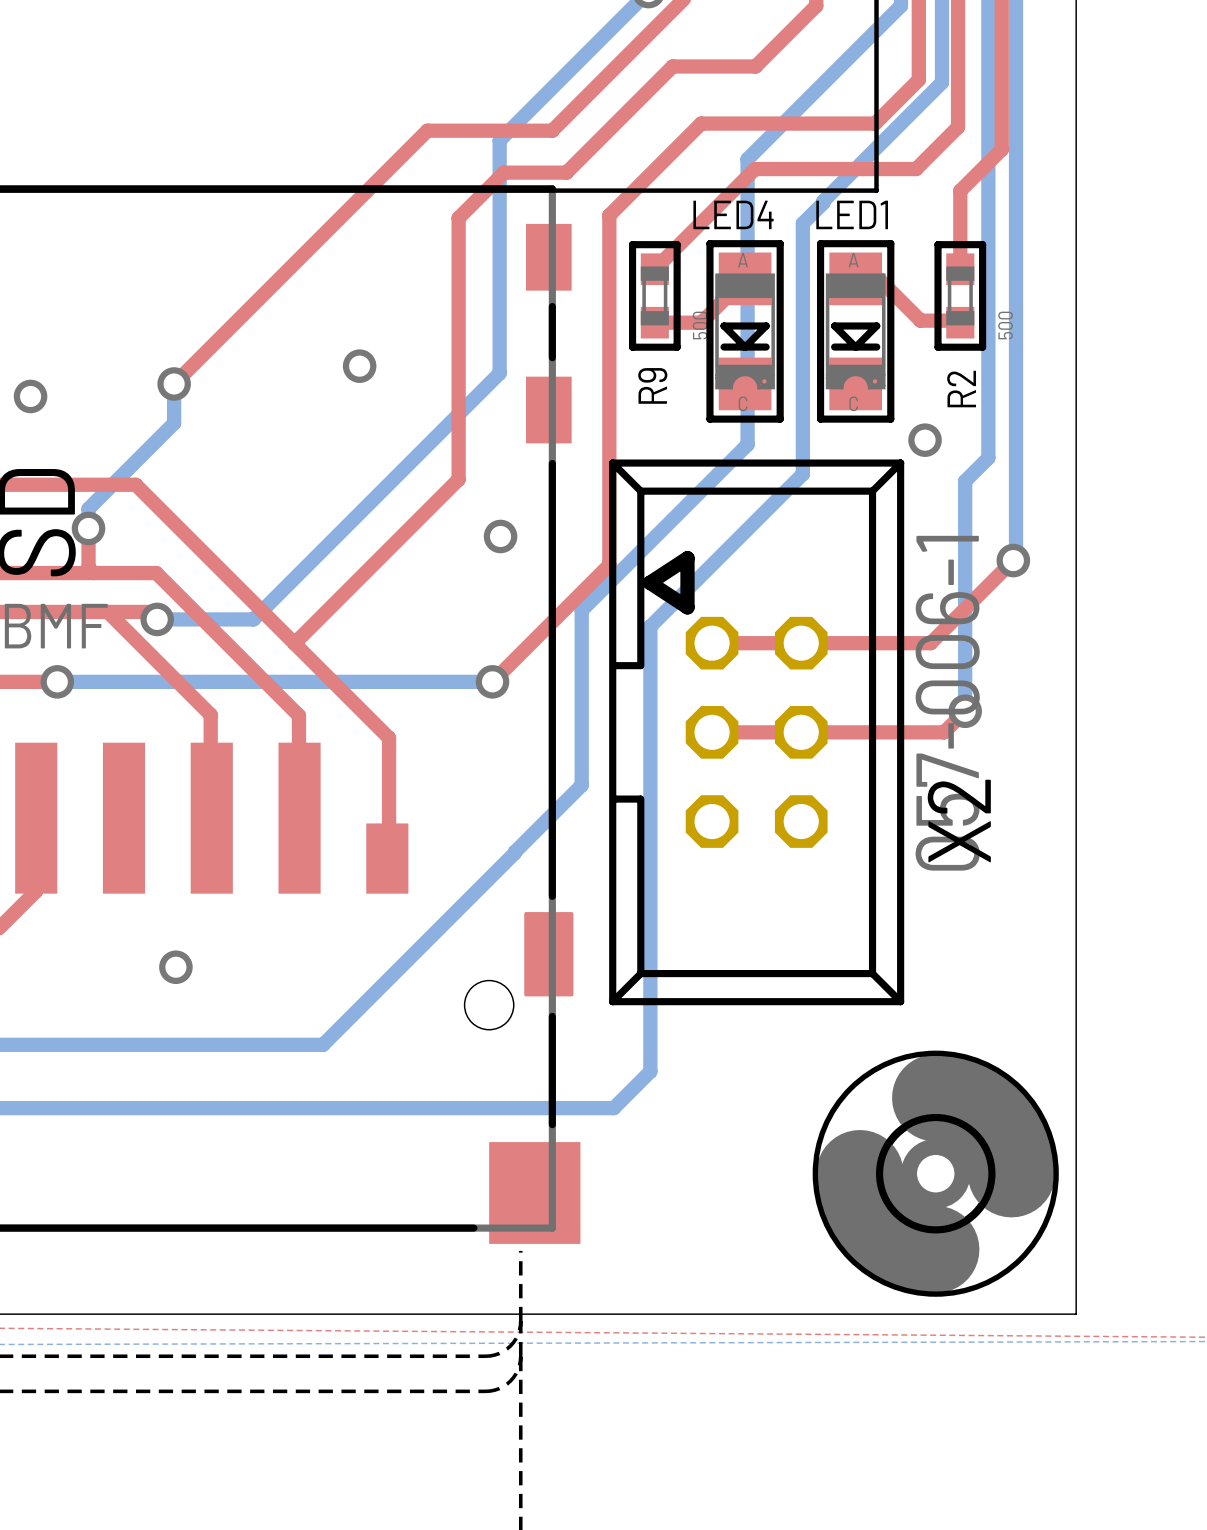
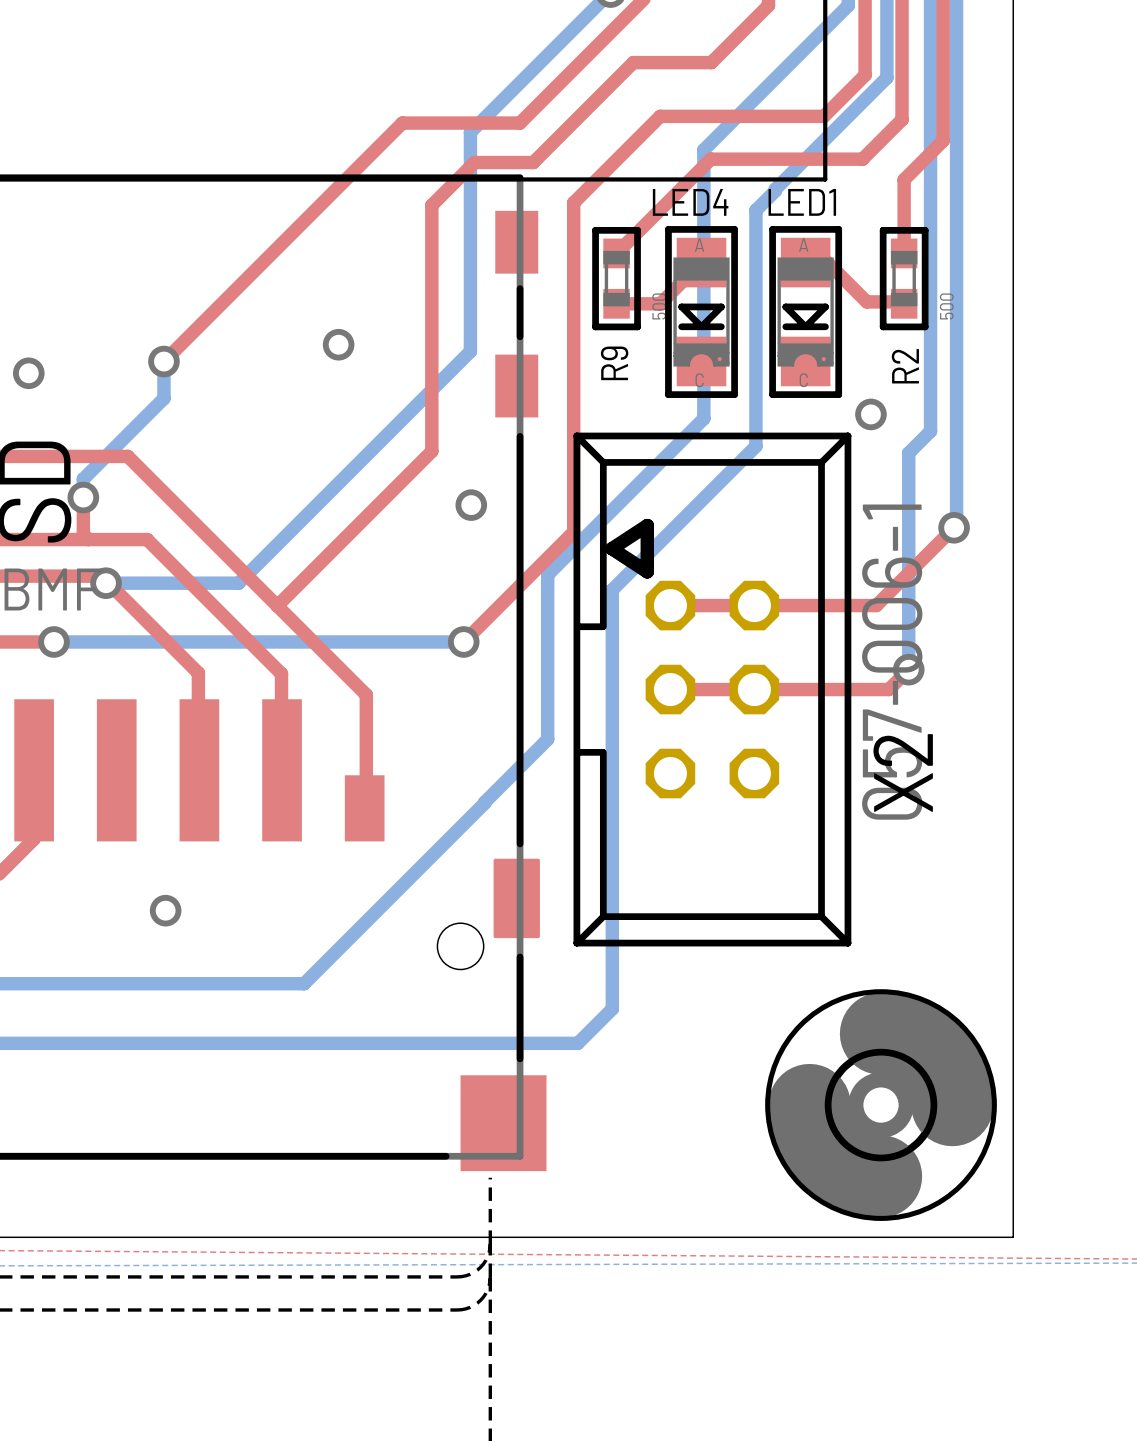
top track: (107, 611) (149, 611) (157, 619) -> none
bottom track: none -> (106, 583) (148, 583)
via position: (157, 619) -> (106, 583)

